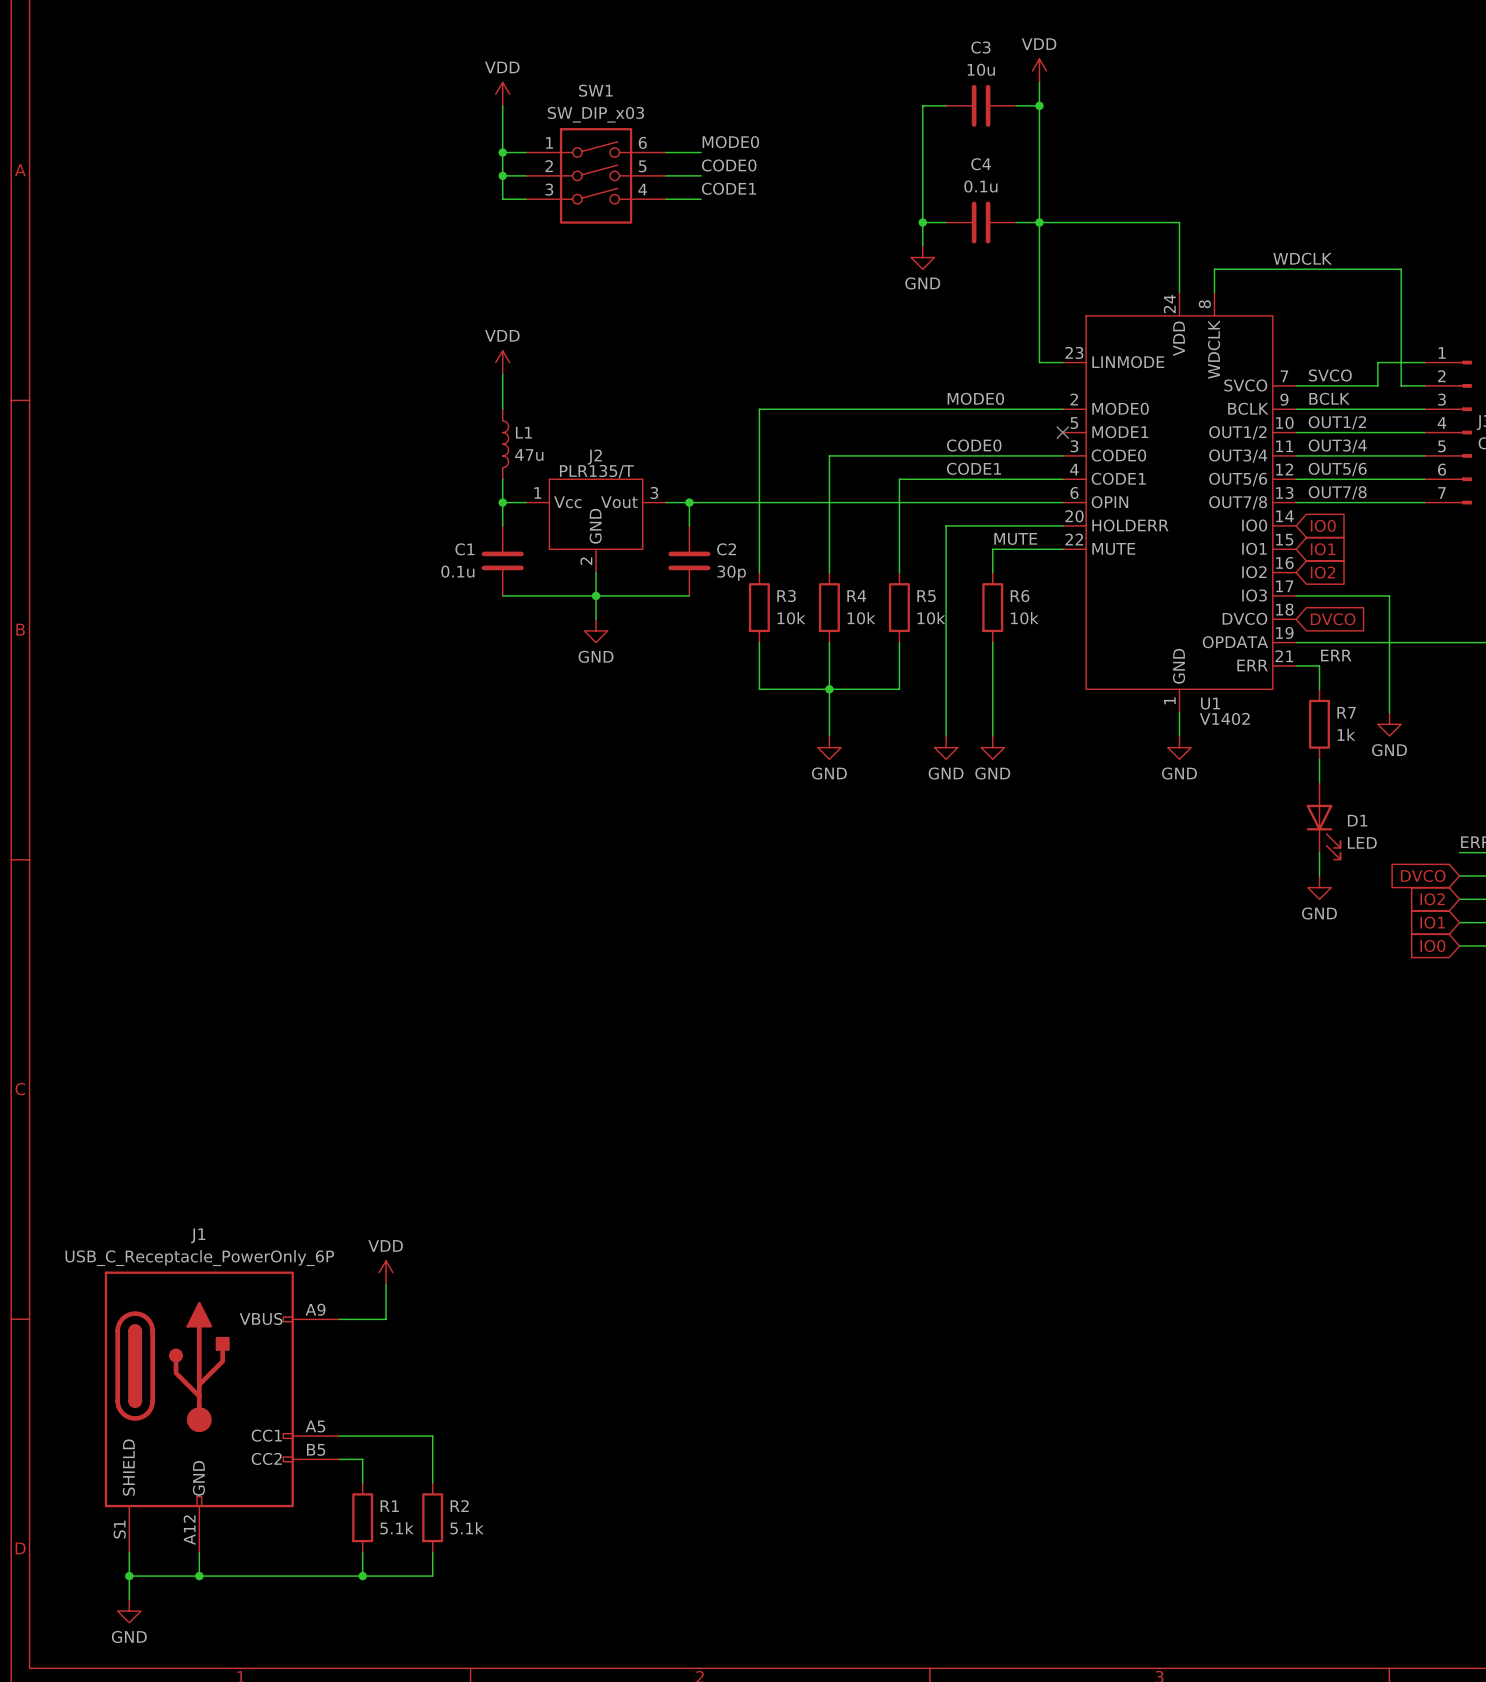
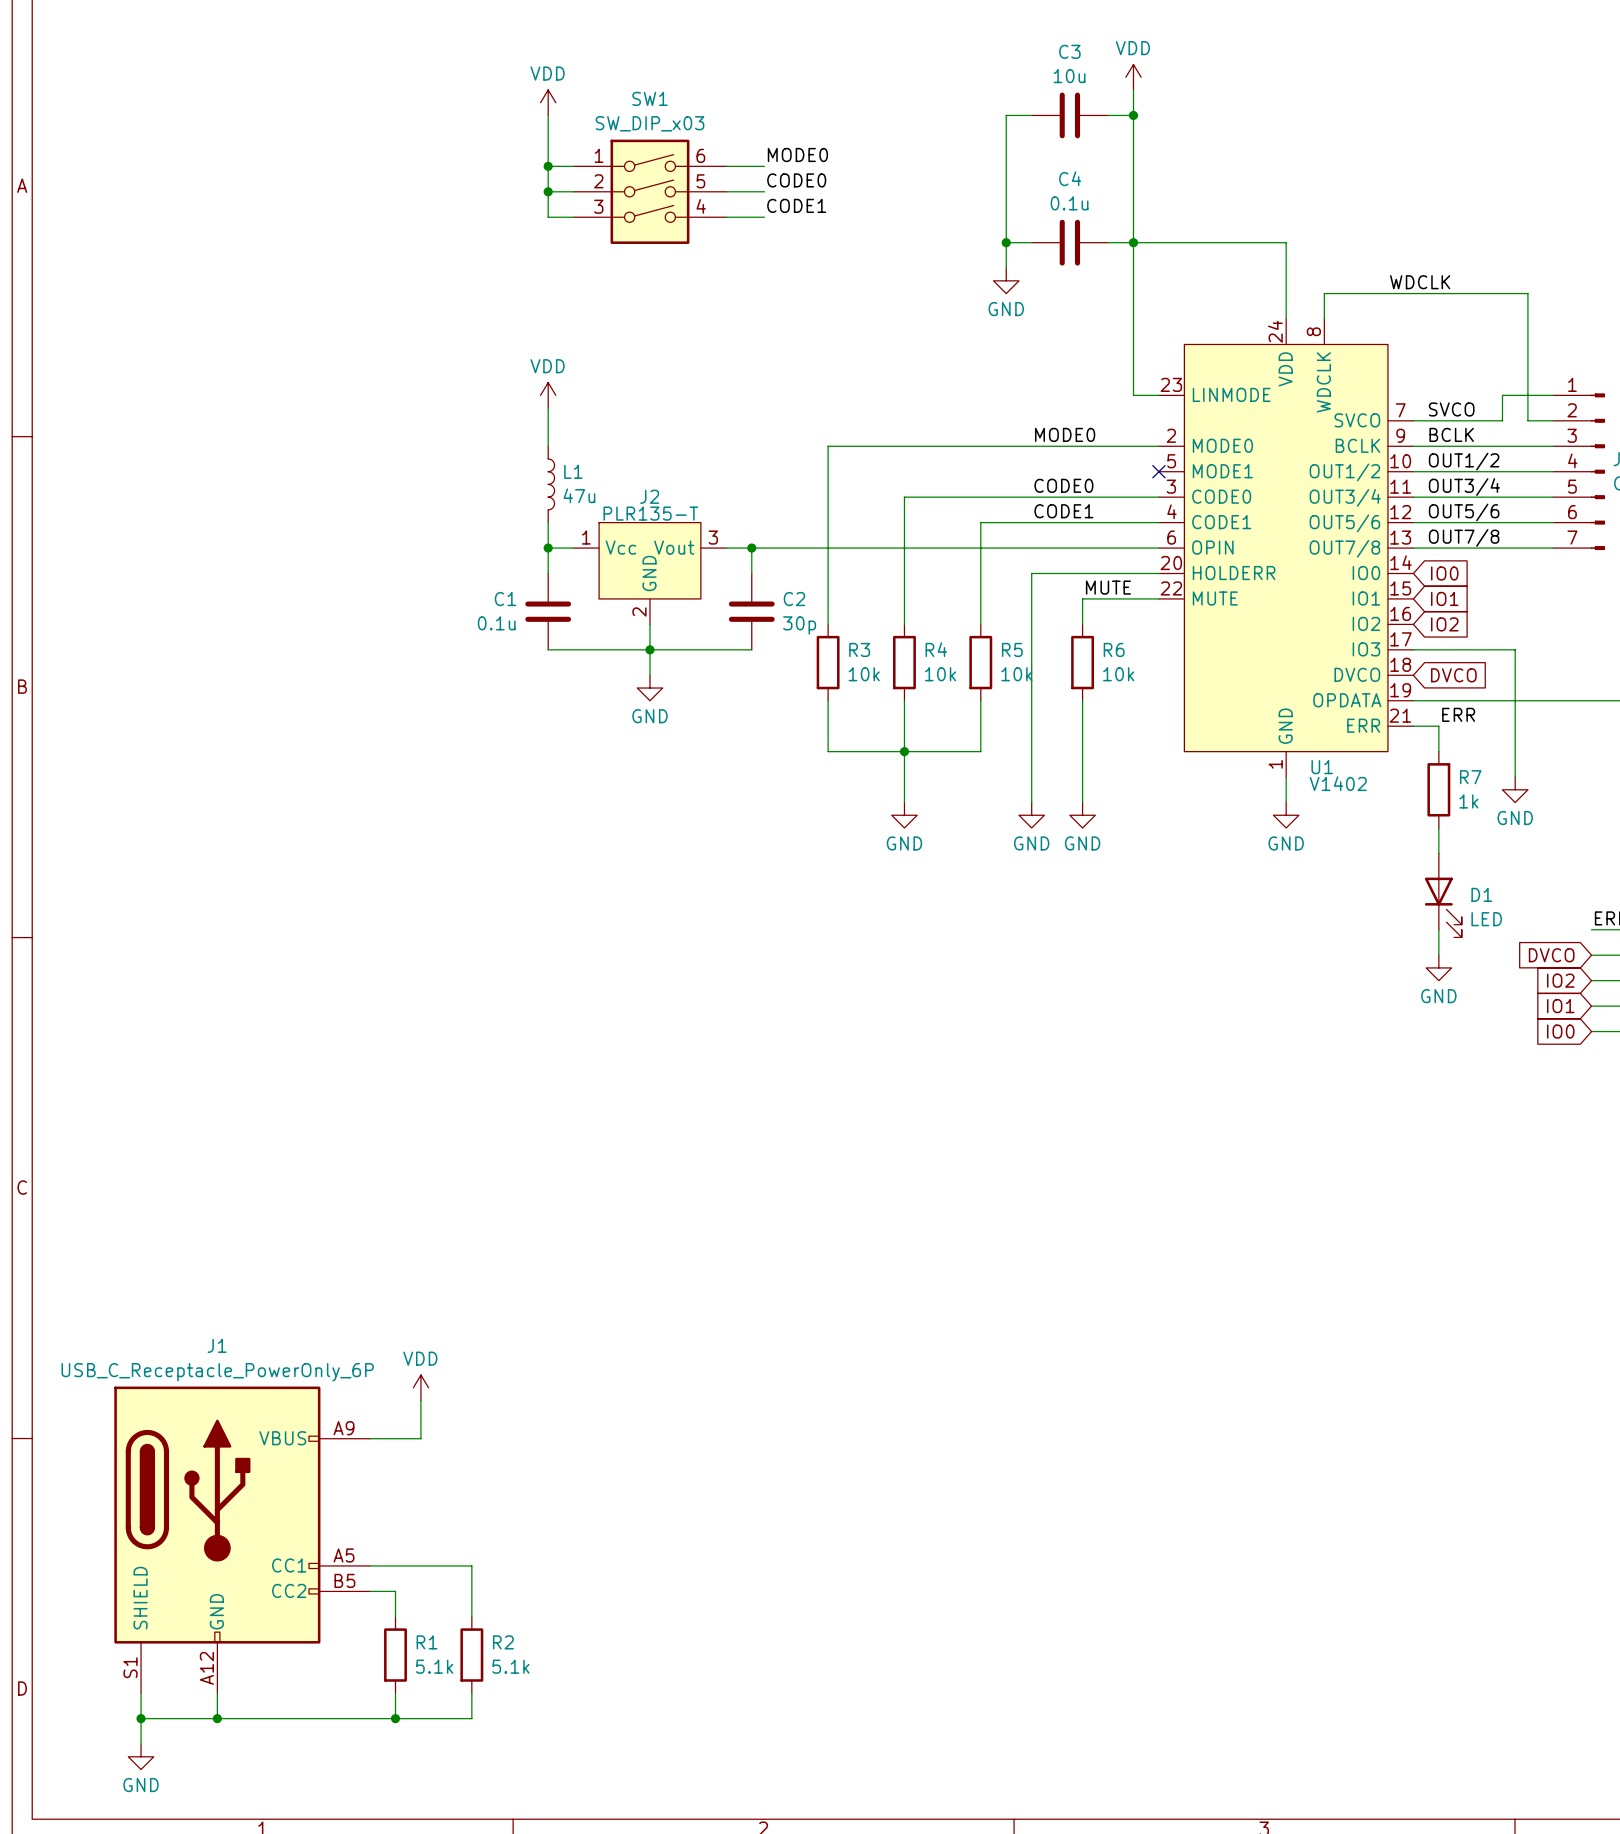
J2 value: PLR135/T (596, 471) -> PLR135-T (650, 513)

